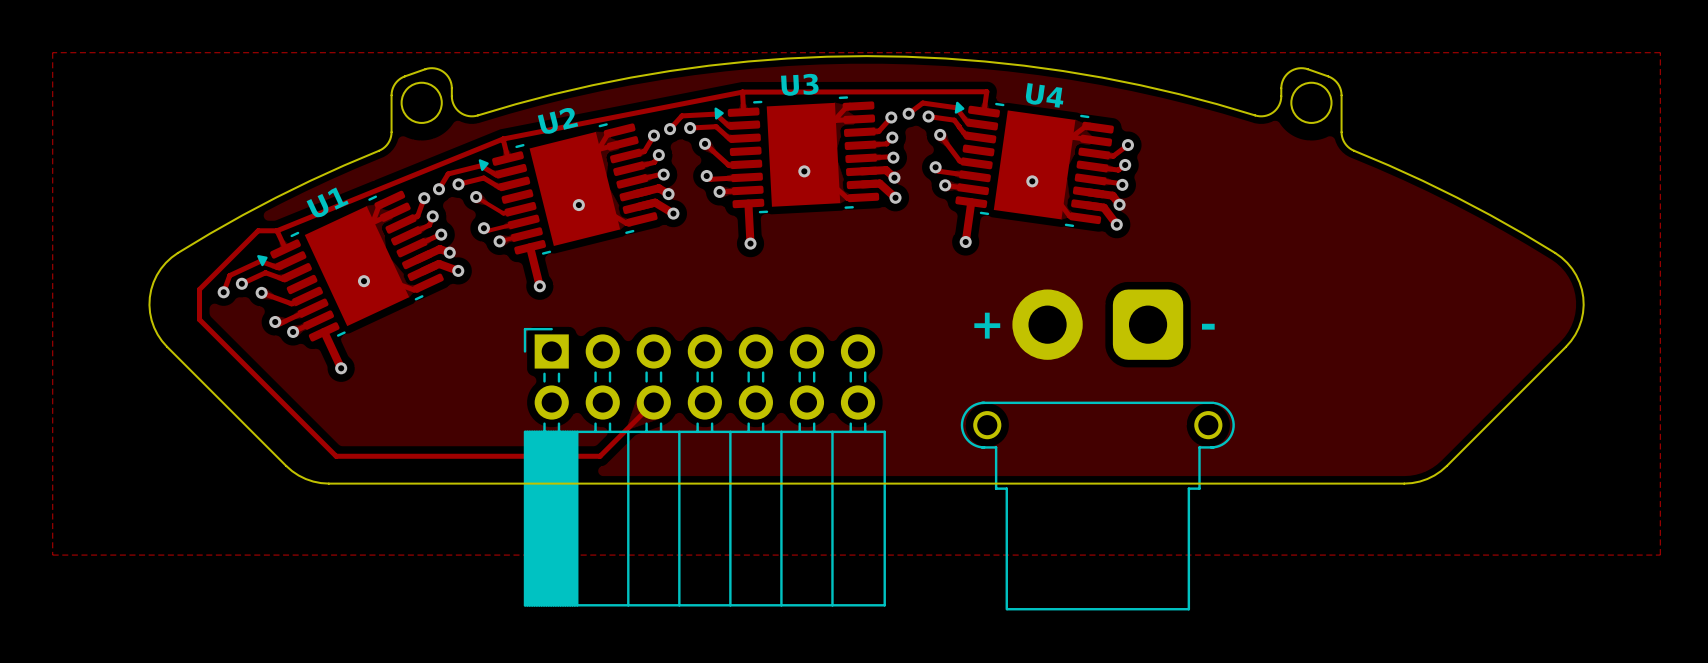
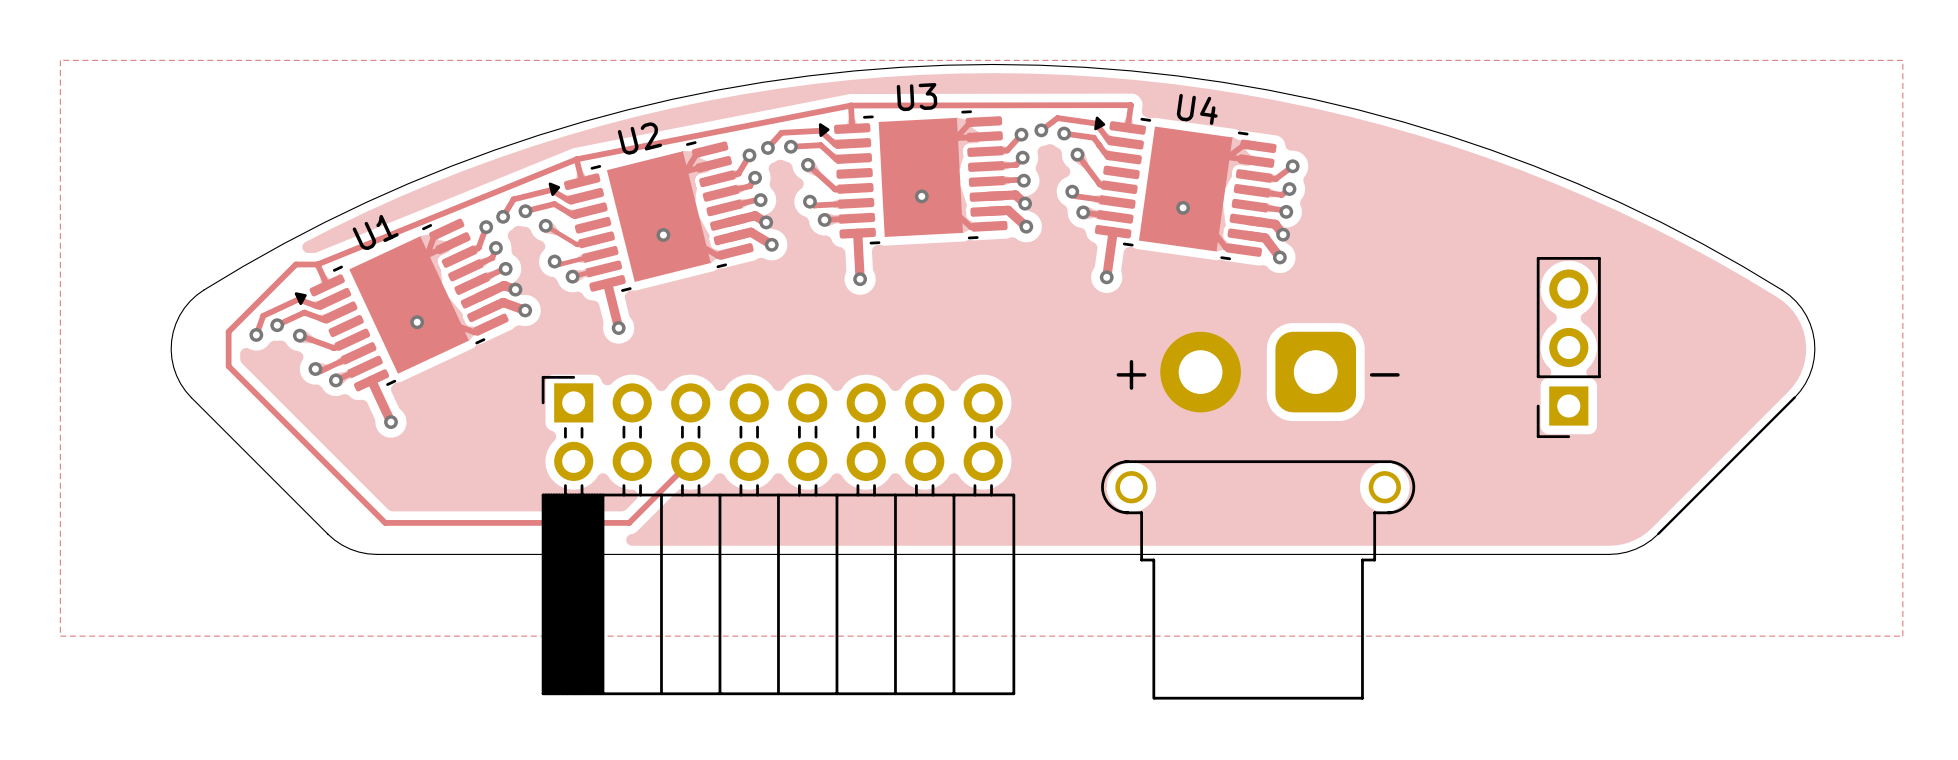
round board edge: [400, 81, 443, 124] -> none
round board edge: [1290, 81, 1333, 124] -> none
part: none -> (1568, 347)
board edge: (1566, 346) (1578, 327) (1583, 305) (1579, 282) (1567, 262) (1555, 253) (1523, 233) (1456, 197) (1349, 148) (1343, 141) (1341, 134) (1341, 95) (1339, 85) (1330, 77) (1303, 68) (1293, 69) (1286, 75) (1281, 83) (1281, 98) (1277, 107) (1271, 113) (1262, 116) (1140, 85) (1063, 71) (984, 61) (866, 56) (748, 61) (670, 71) (592, 85) (470, 116) (462, 113) (455, 107) (451, 98) (451, 83) (446, 75) (436, 68) (427, 68) (402, 77) (393, 85) (391, 95) (391, 134) (385, 147) (276, 197) (177, 253) (160, 268) (153, 282) (149, 297) (150, 312) (154, 327) (167, 346) (286, 465) (298, 475) (320, 483) (1404, 483) (1427, 479) (1446, 465) -> (1794, 397) (1809, 375) (1814, 349) (1810, 323) (1796, 301) (1782, 290) (1702, 243) (1577, 183) (1447, 135) (1313, 99) (1177, 75) (1039, 65) (900, 67) (808, 75) (672, 99) (538, 135) (451, 166) (366, 202) (243, 266) (203, 290) (190, 301) (175, 323) (171, 340) (173, 367) (180, 383) (191, 397) (327, 534) (342, 545) (367, 553) (1609, 554) (1635, 549) (1658, 534)
track: (653, 402) (600, 456) (549, 456) -> (690, 461) (629, 522)
part: none -> (778, 535)
part: (704, 467) -> none

